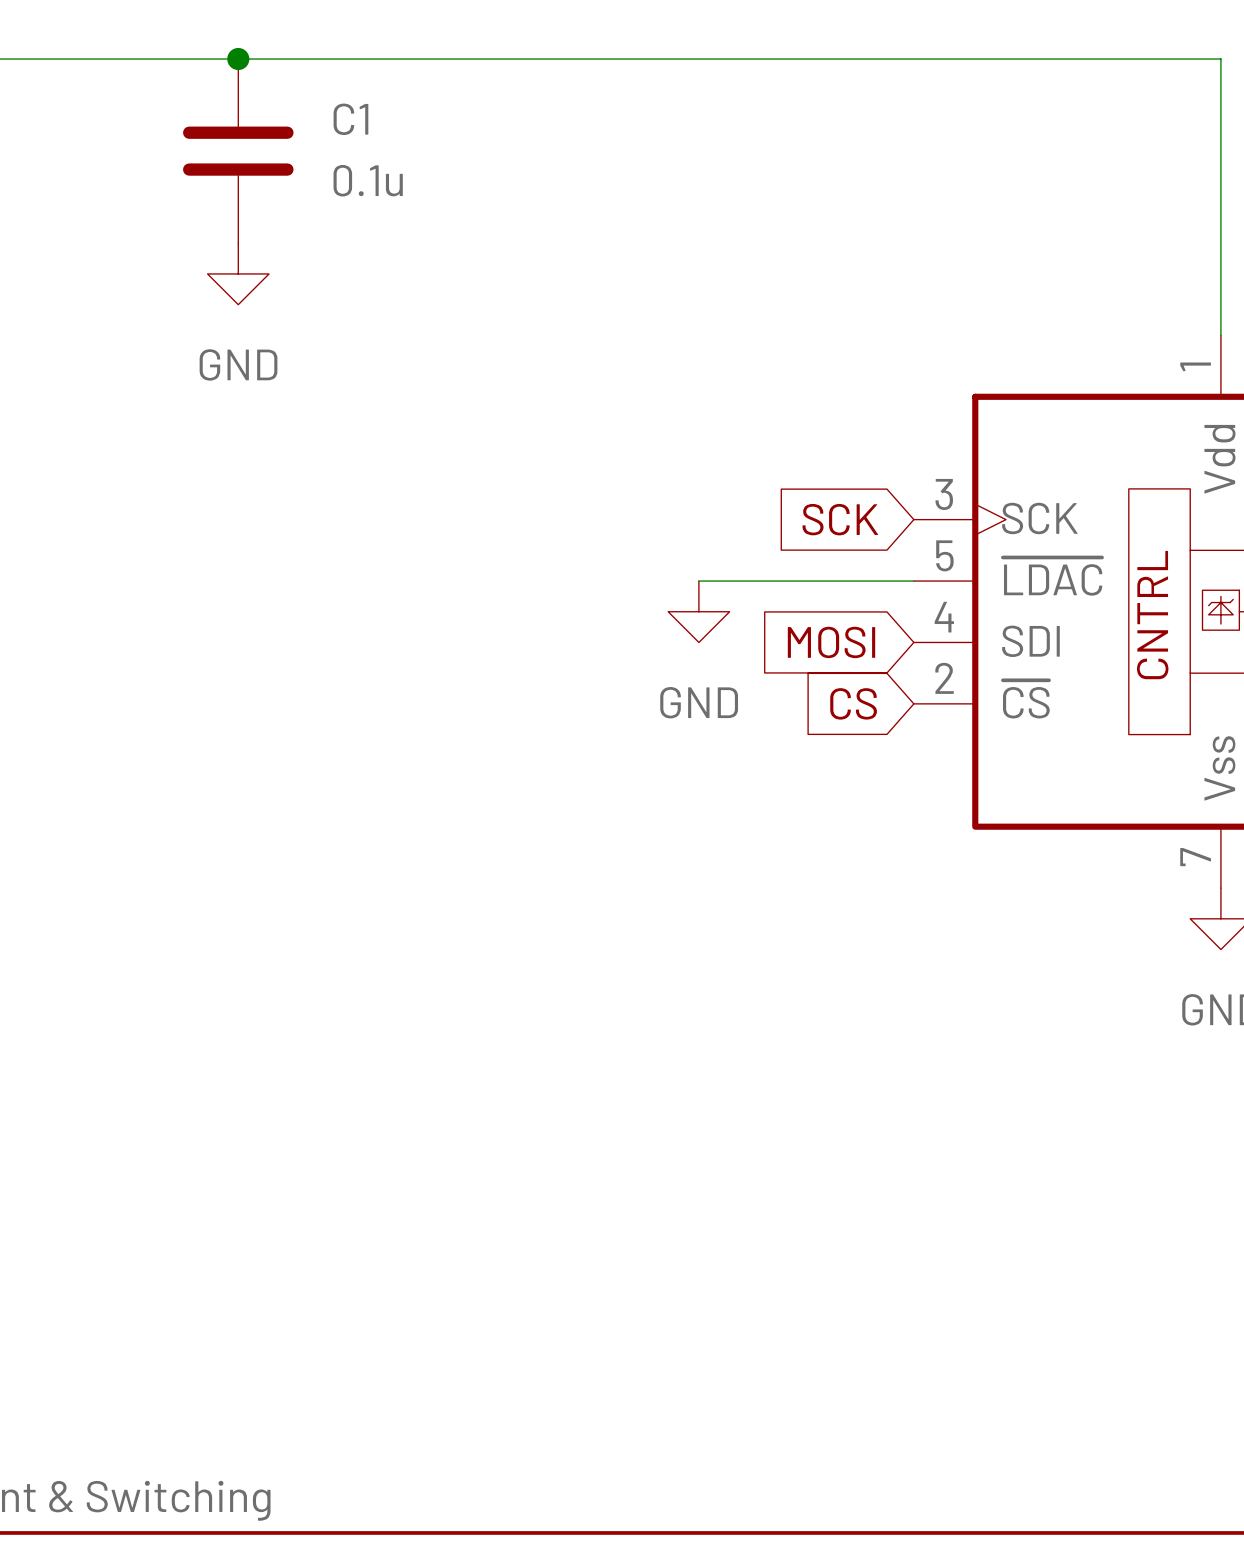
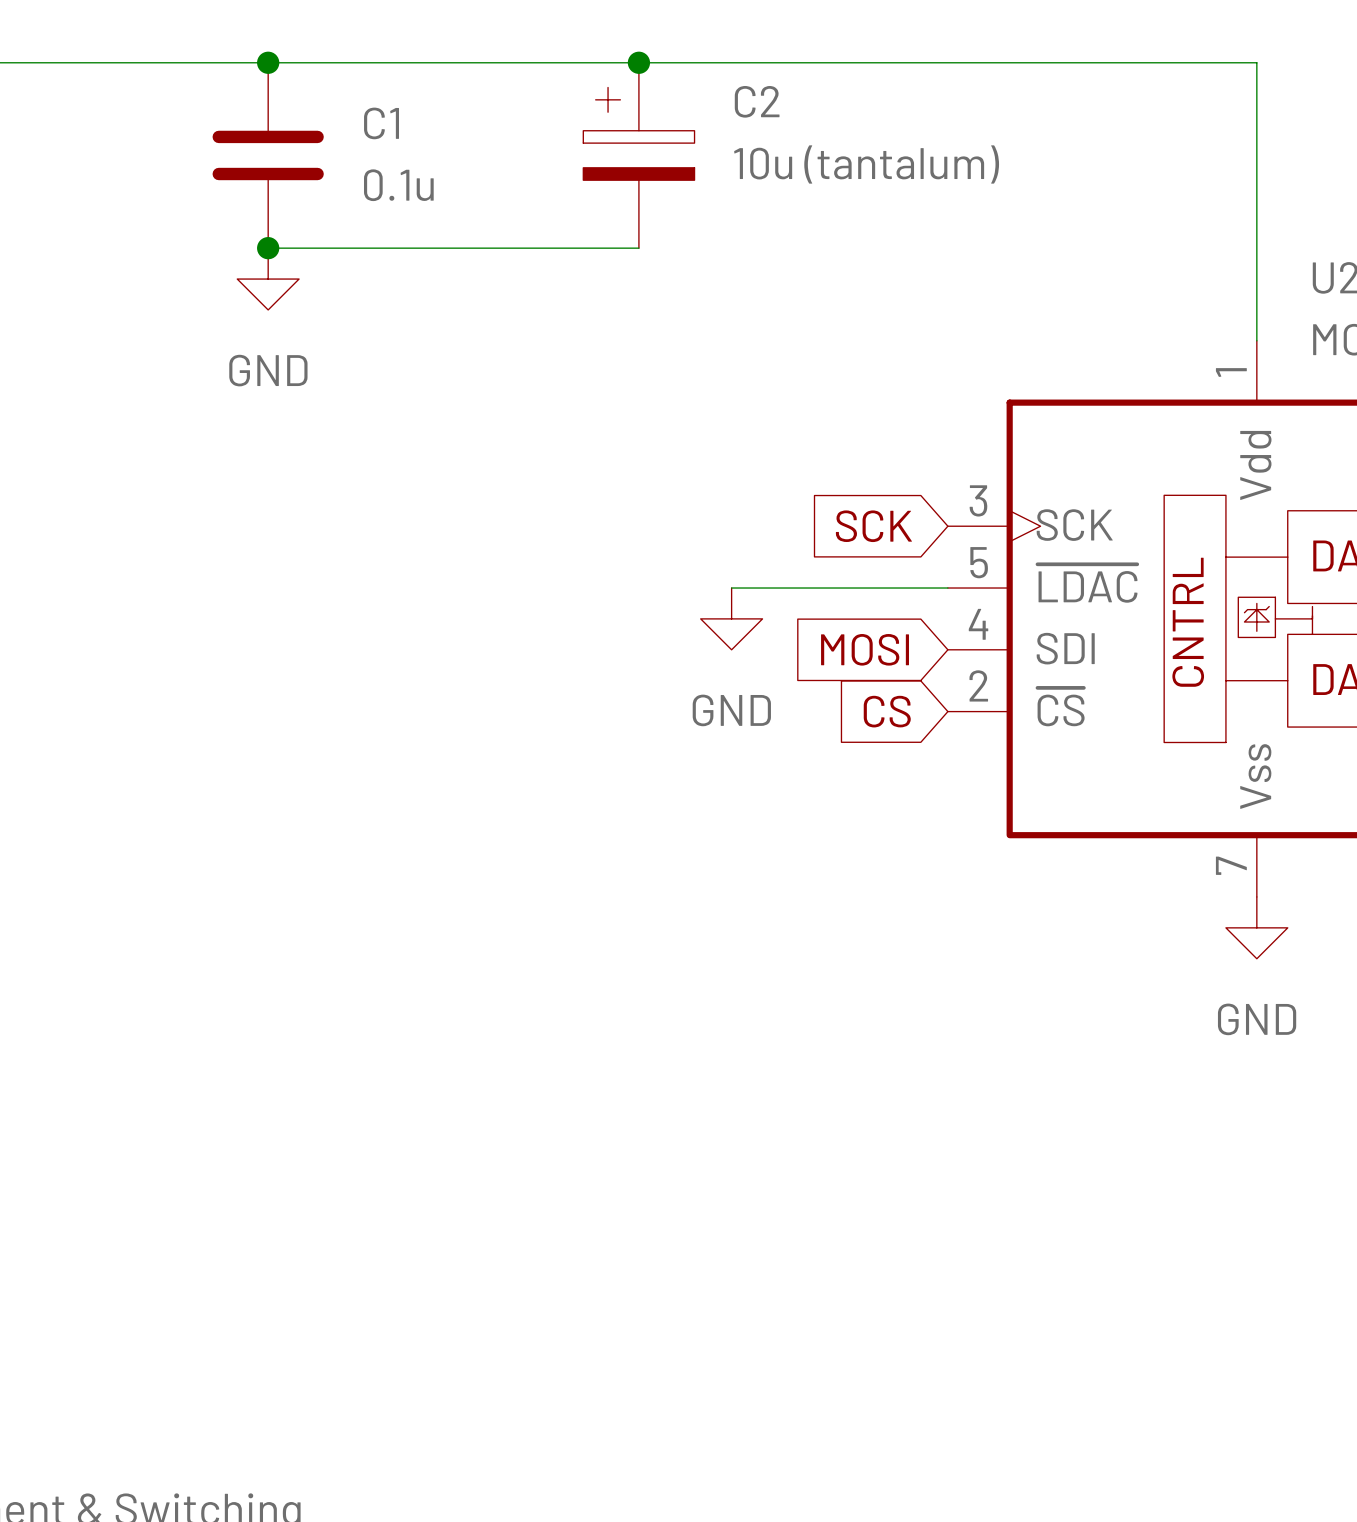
junction: none -> (638, 62)
C2: none -> 10u (tantalum) (638, 155)
wire: none -> (268, 248) (638, 248)
junction: none -> (268, 248)

